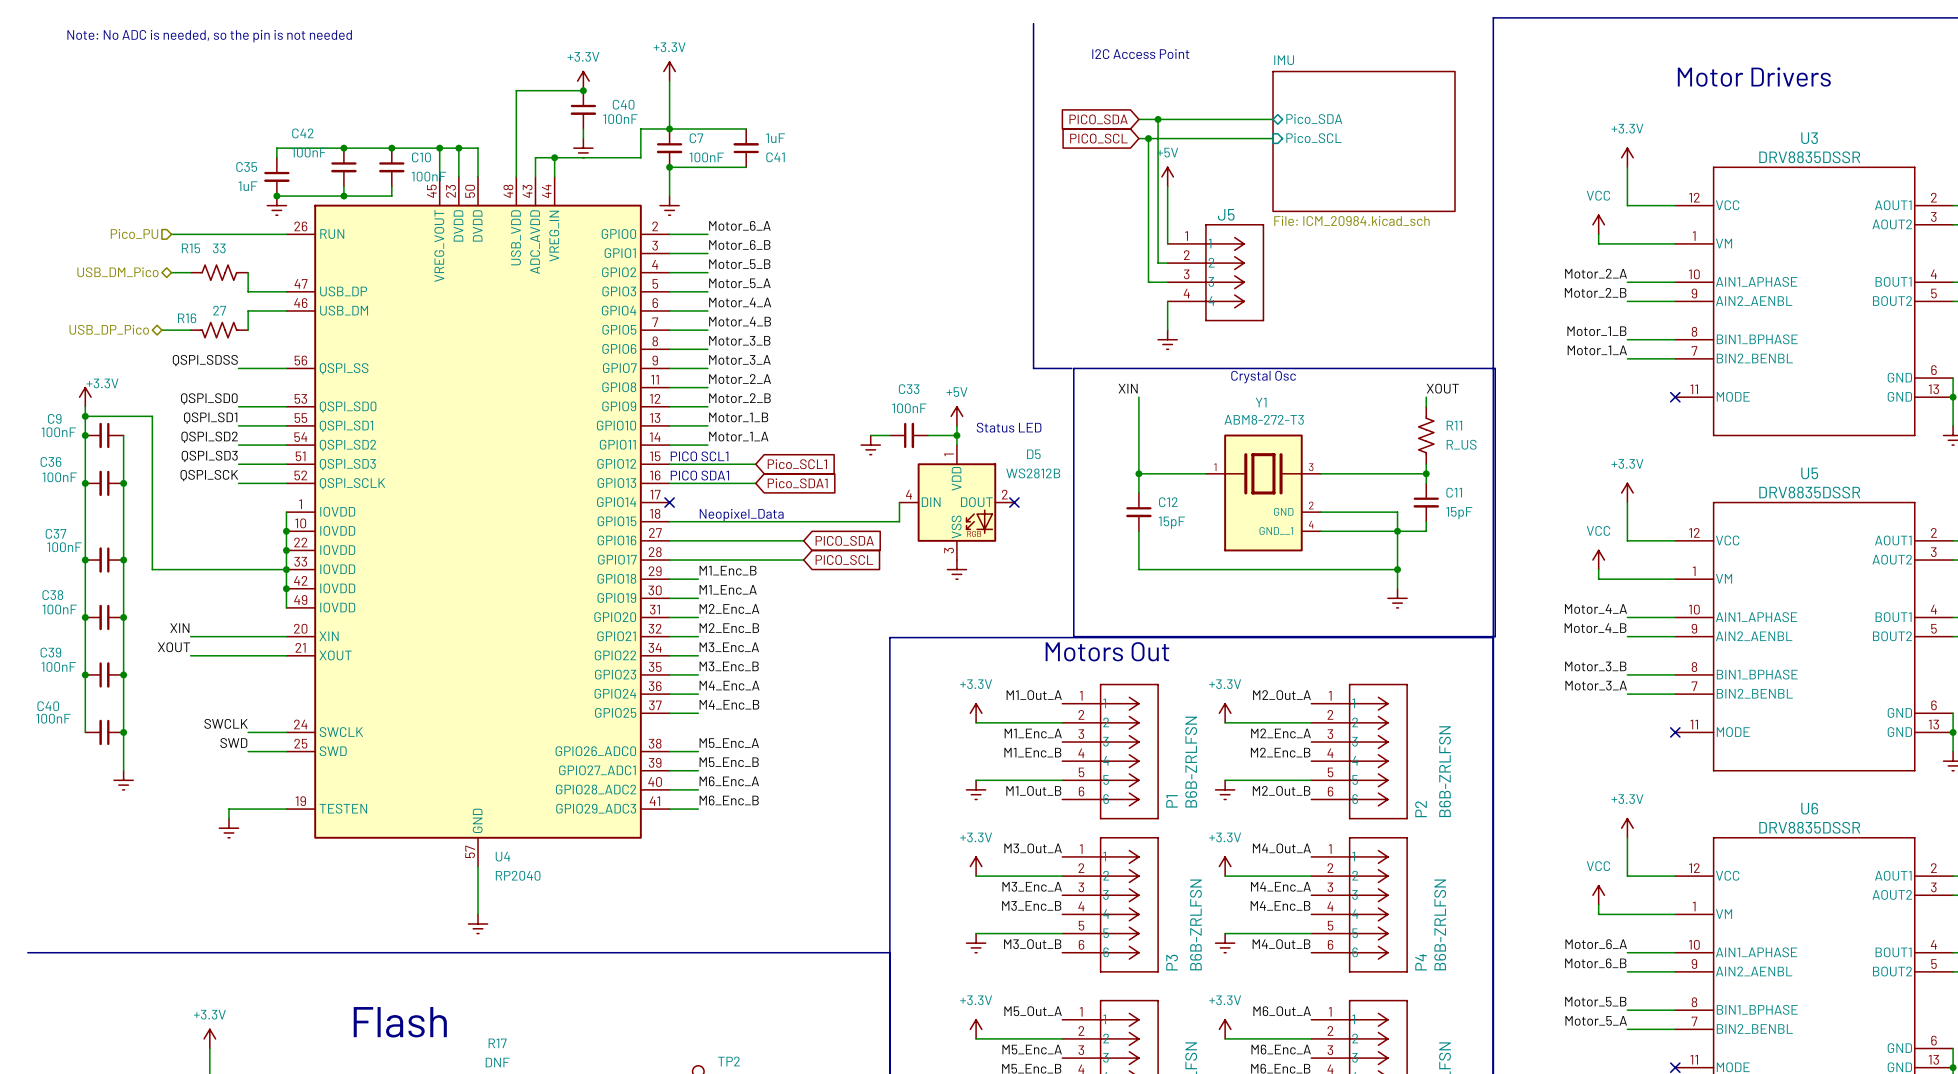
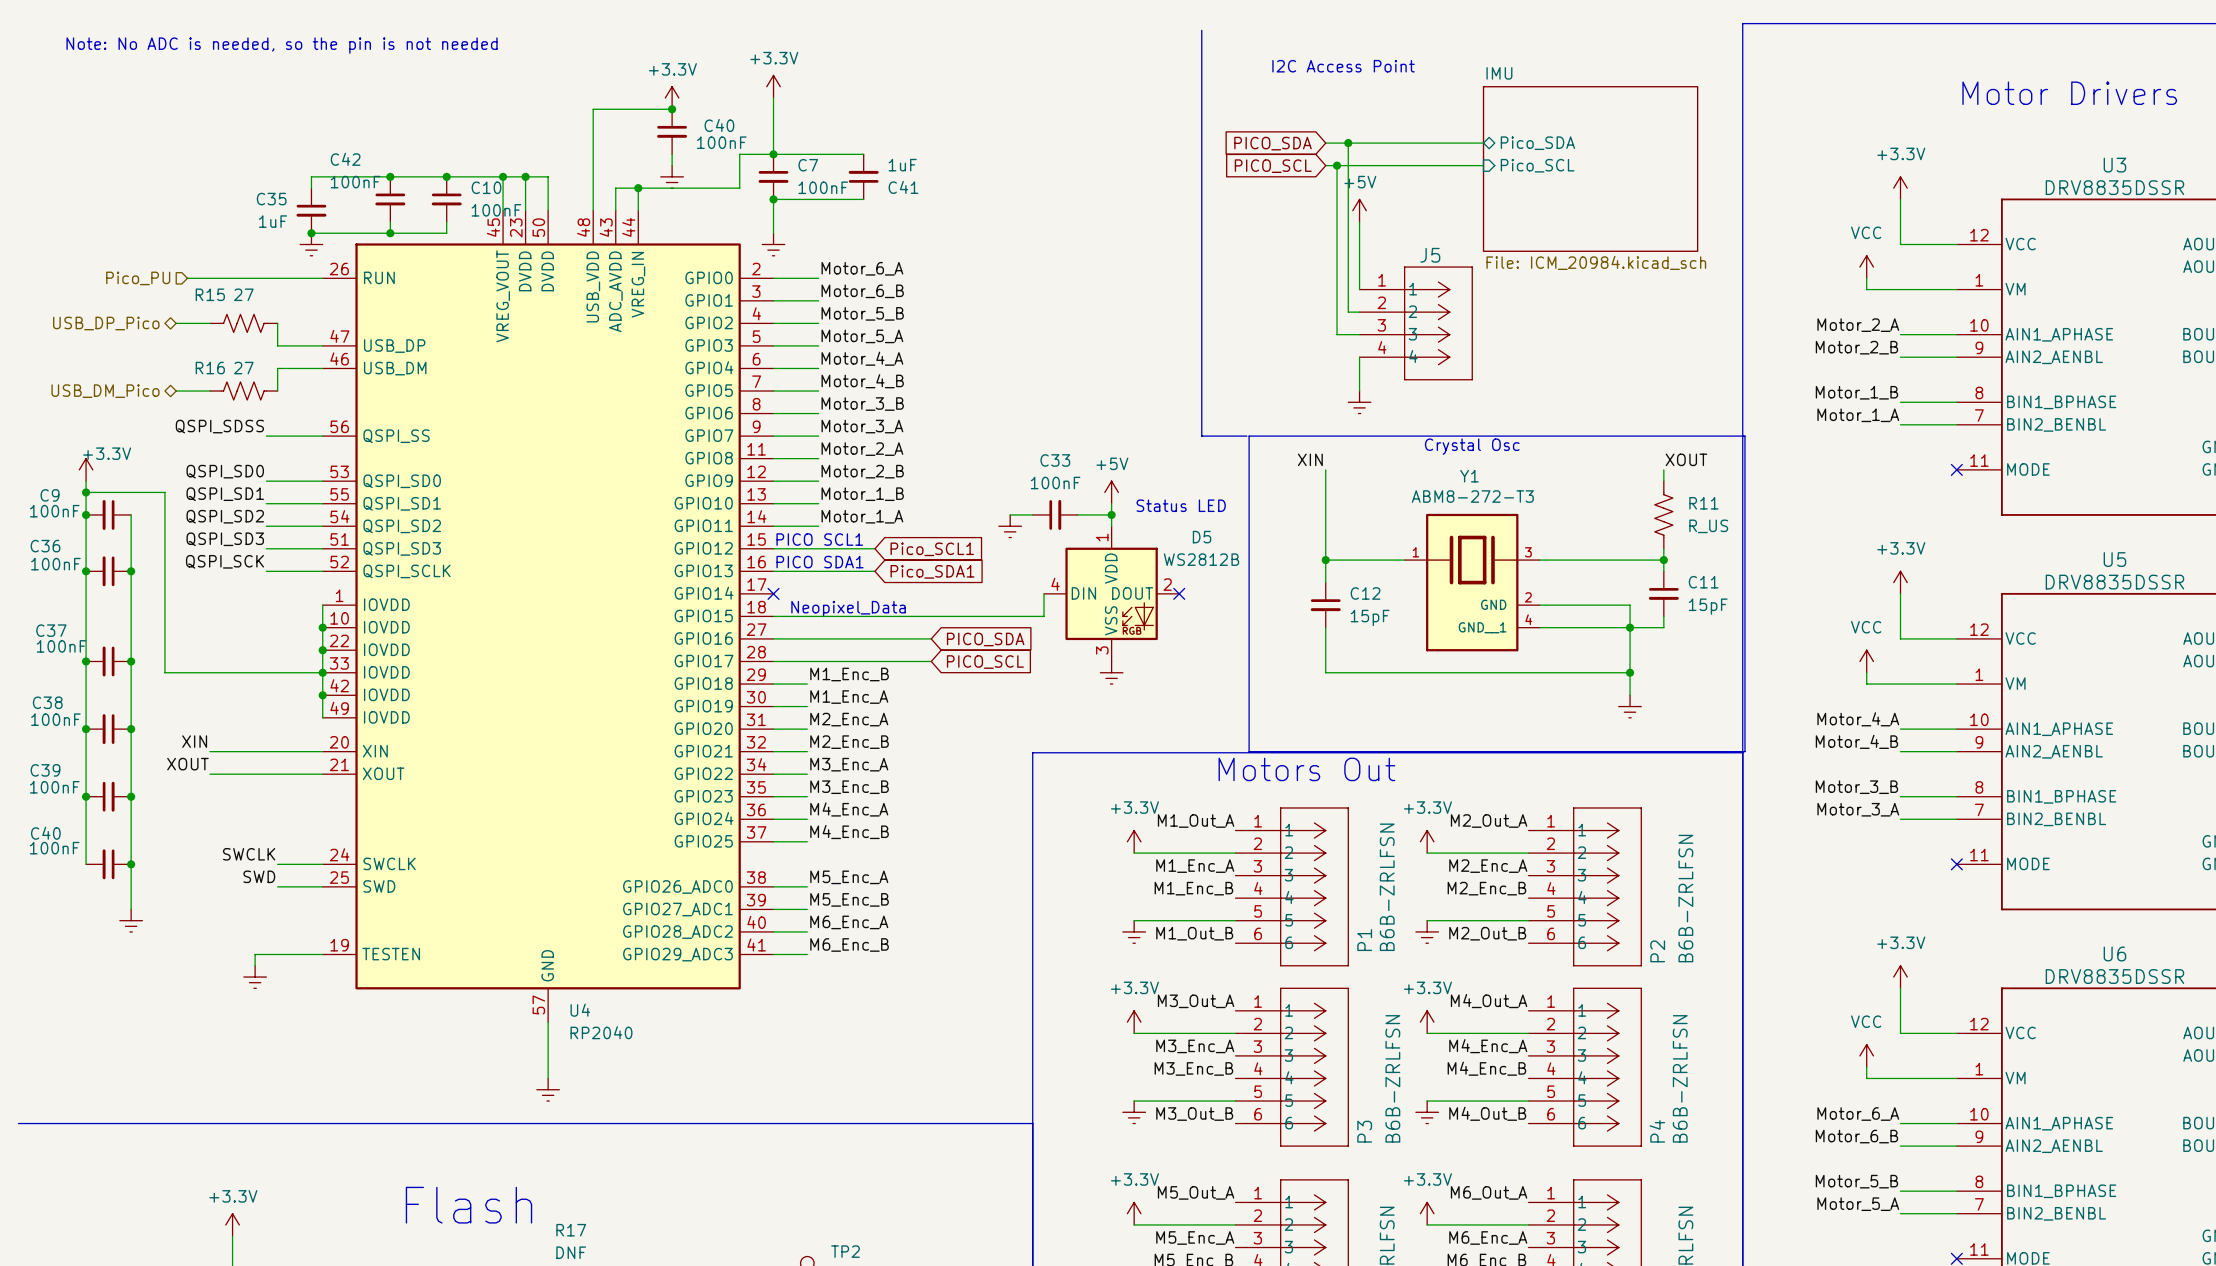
R15 value: 33 (219, 248) -> 27 (243, 294)
hierarchical label: USB_DM_Pico (117, 272) -> USB_DP_Pico (106, 323)
wire: none -> (176, 323) (187, 323)
hierarchical label: USB_DP_Pico (109, 329) -> USB_DM_Pico (105, 391)
R16 flip: as is (219, 330) -> left-right (243, 391)

